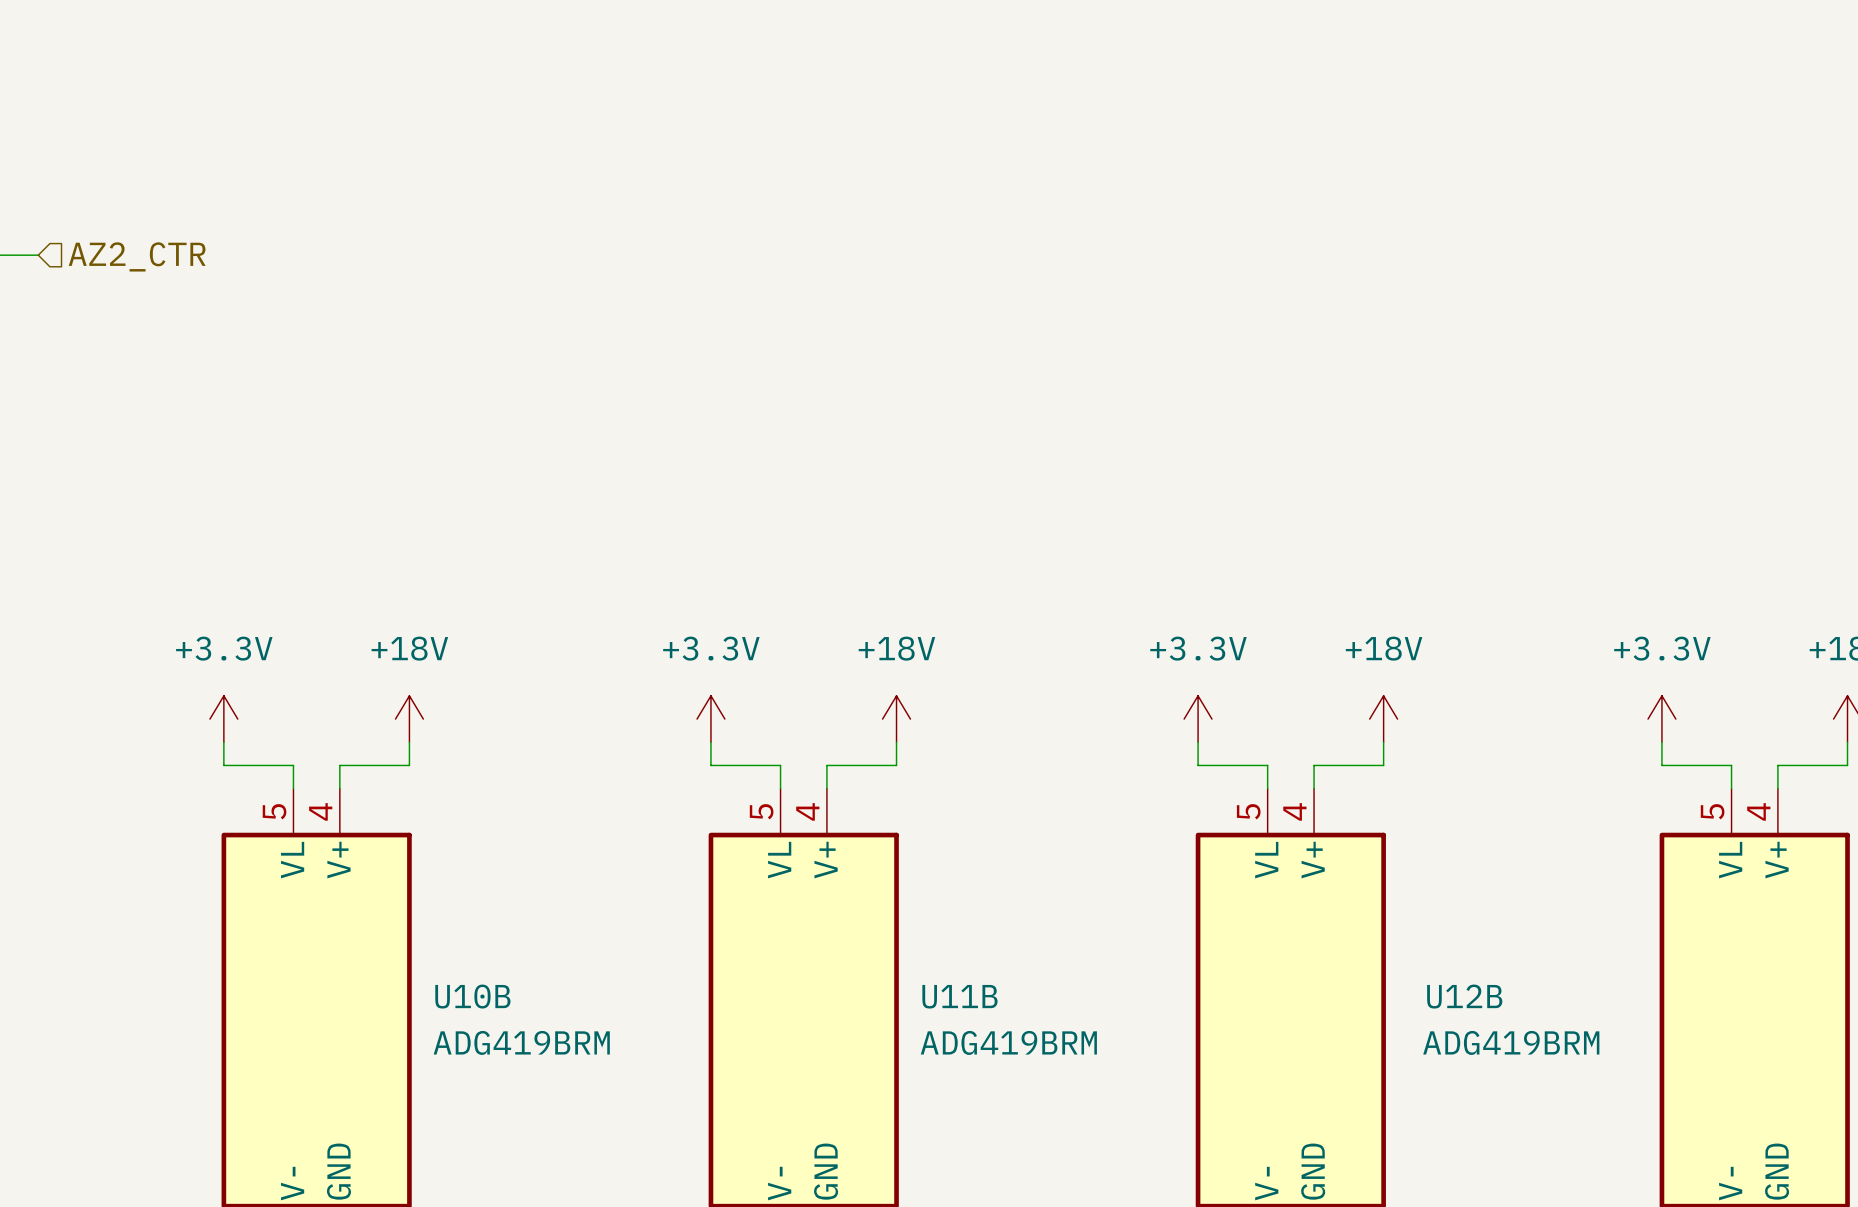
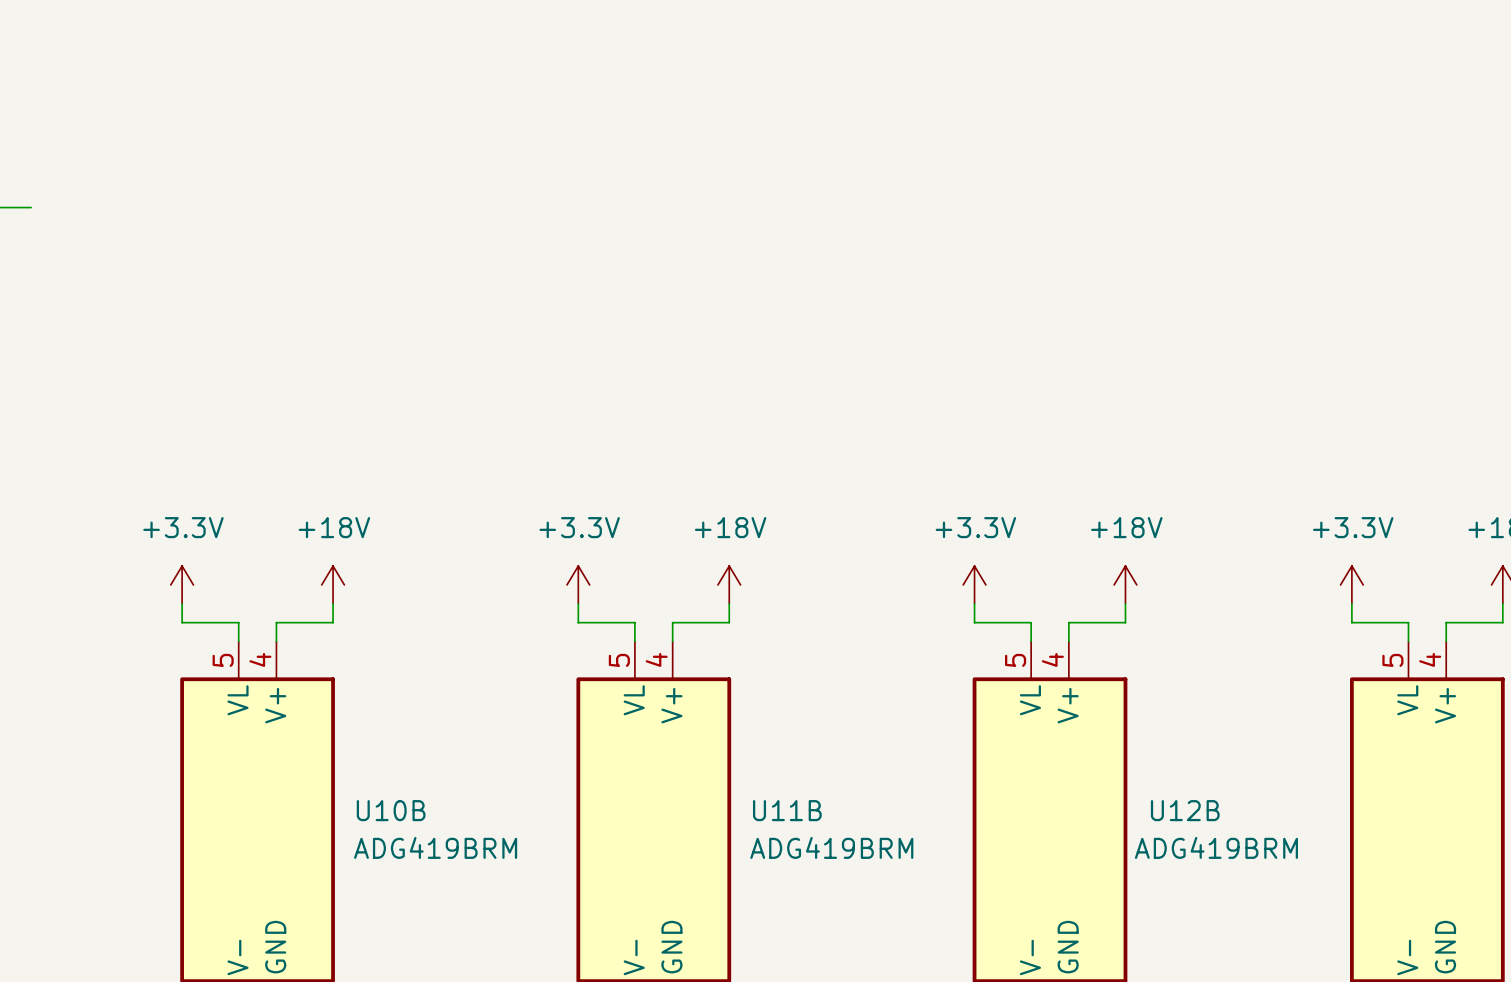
hierarchical label: AZ2_CTR (137, 256) -> none

